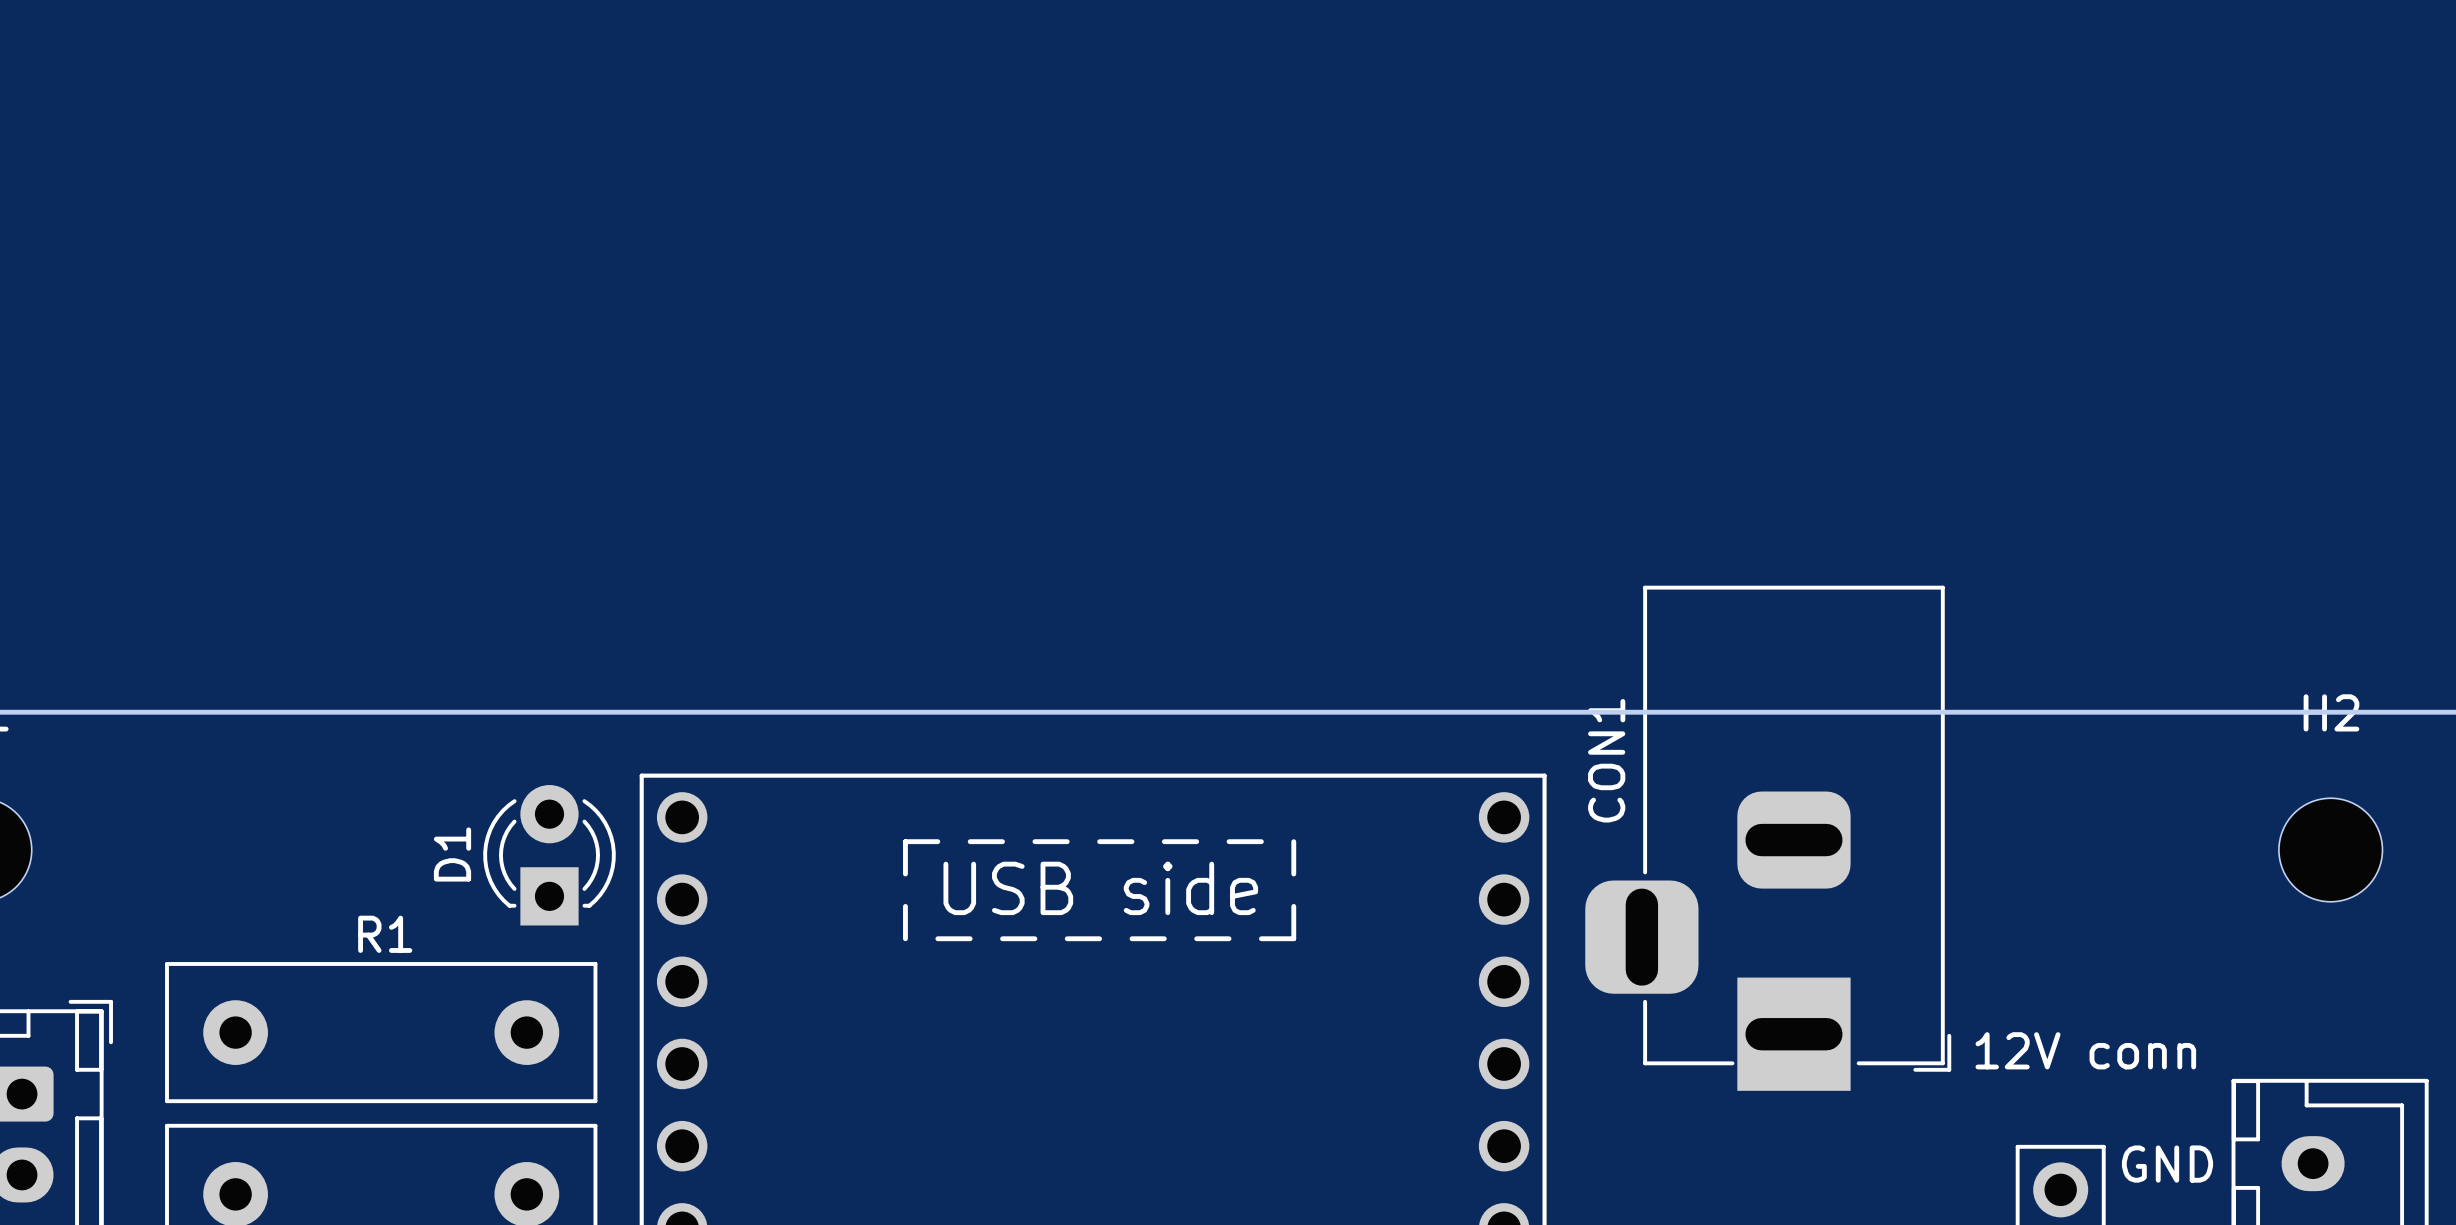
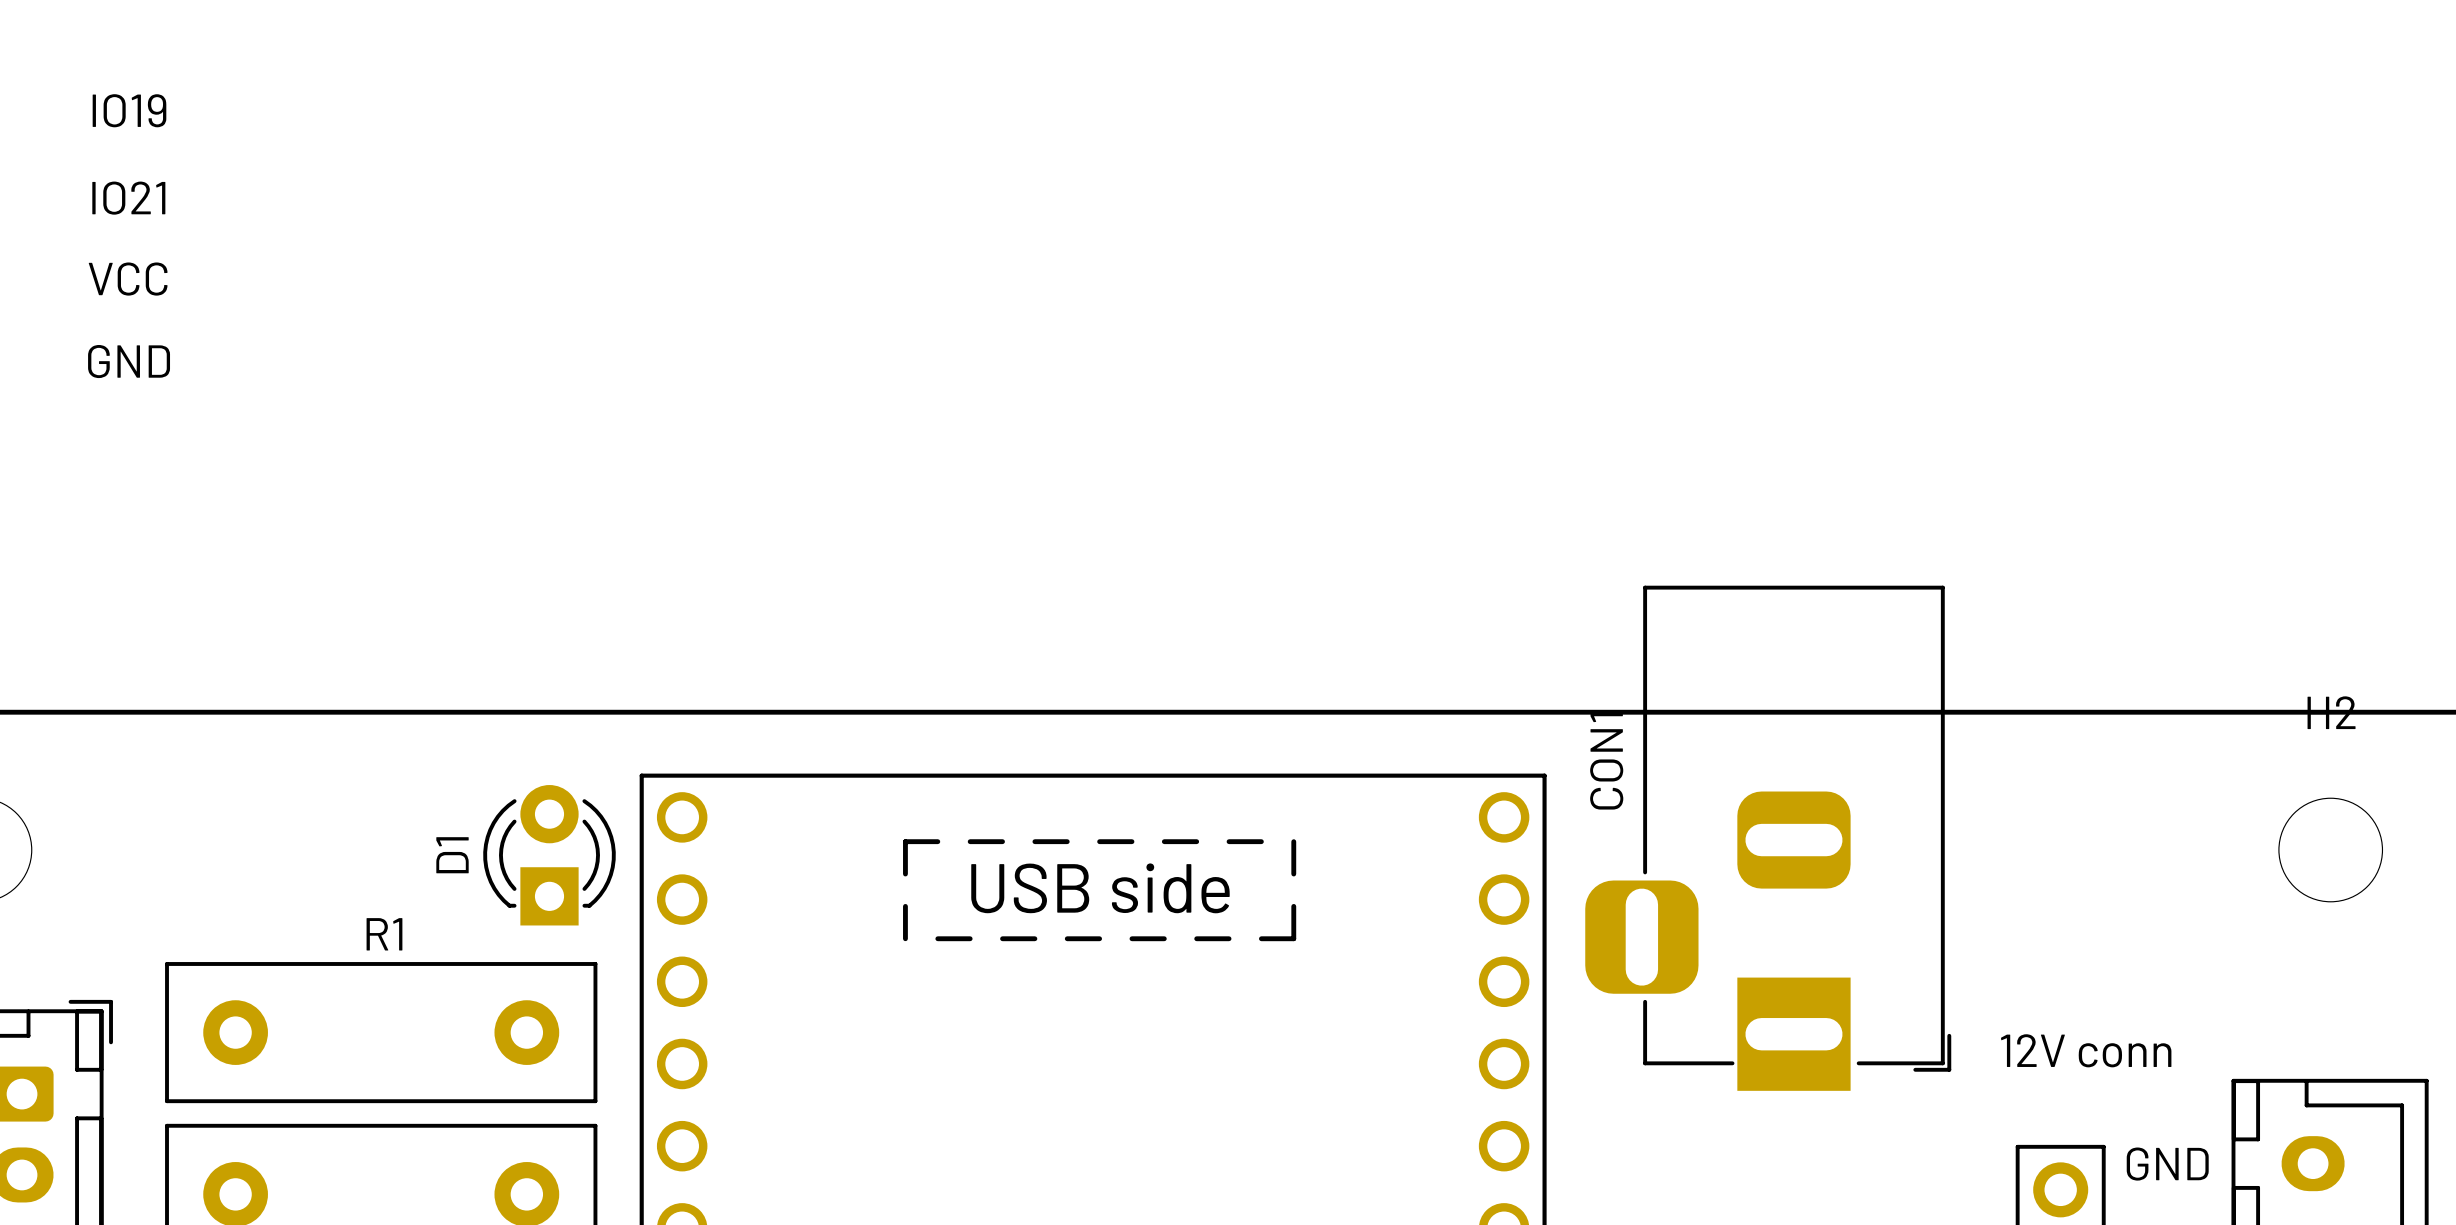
text: none -> IO19 (129, 110)
text: none -> IO21 (128, 198)
text: none -> VCC (128, 279)
text: none -> GND (129, 361)

